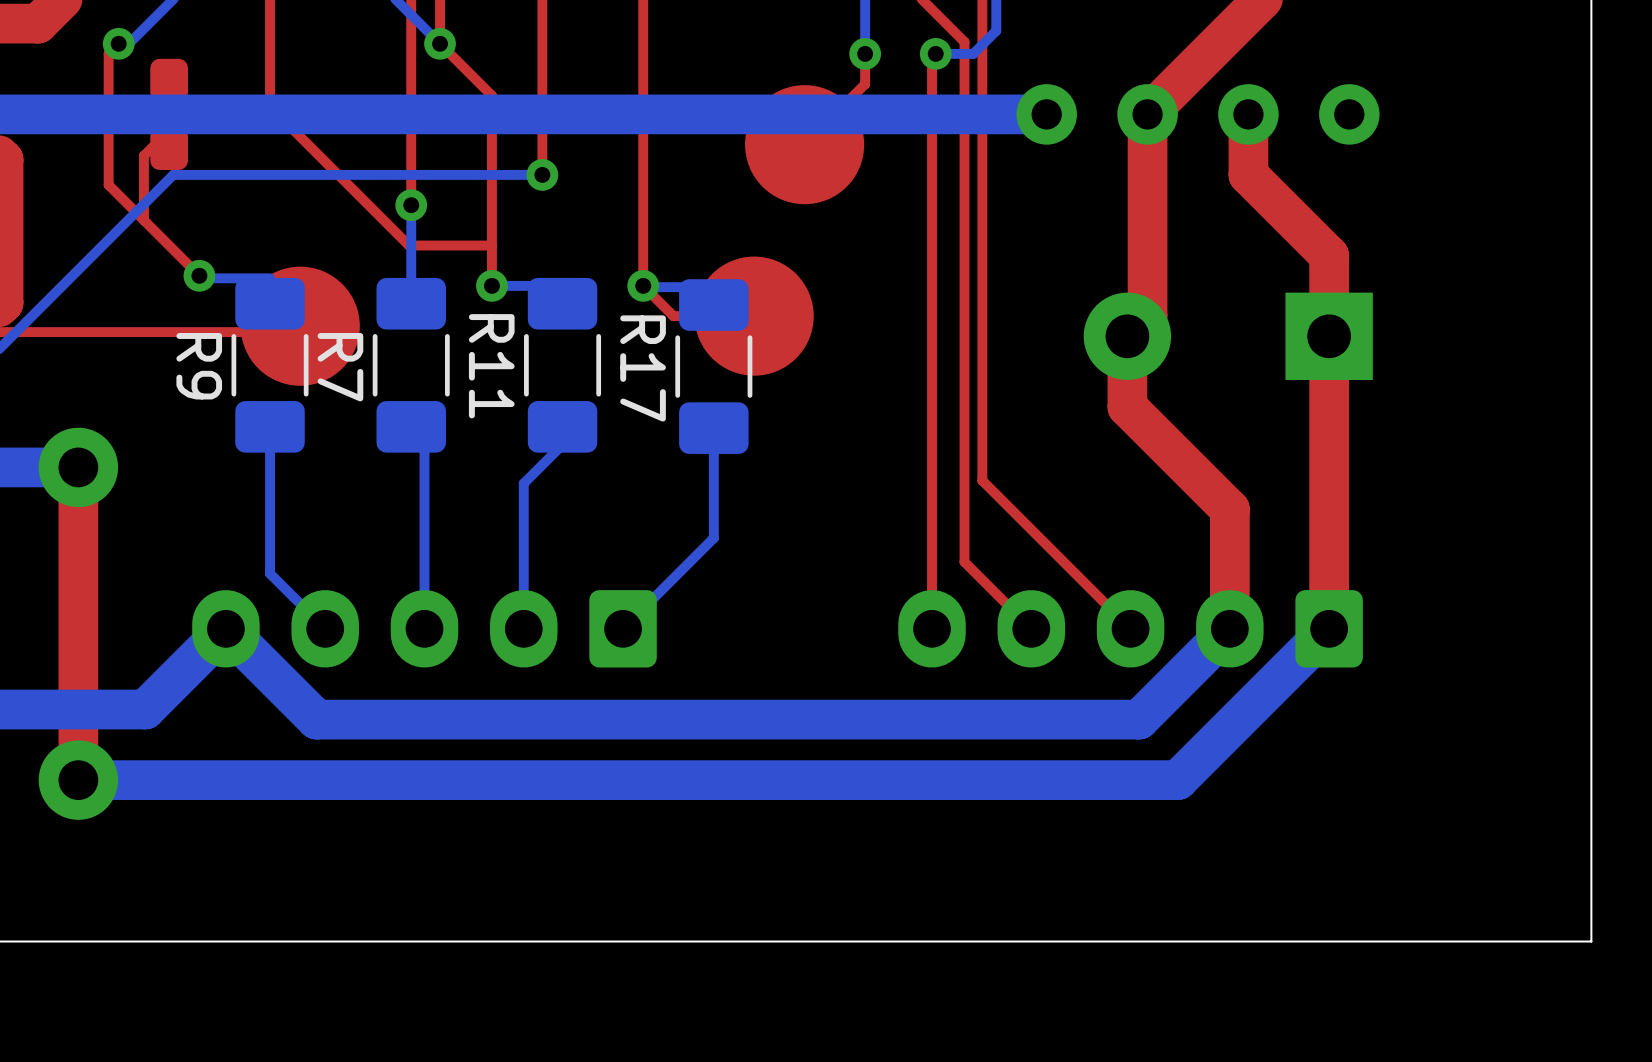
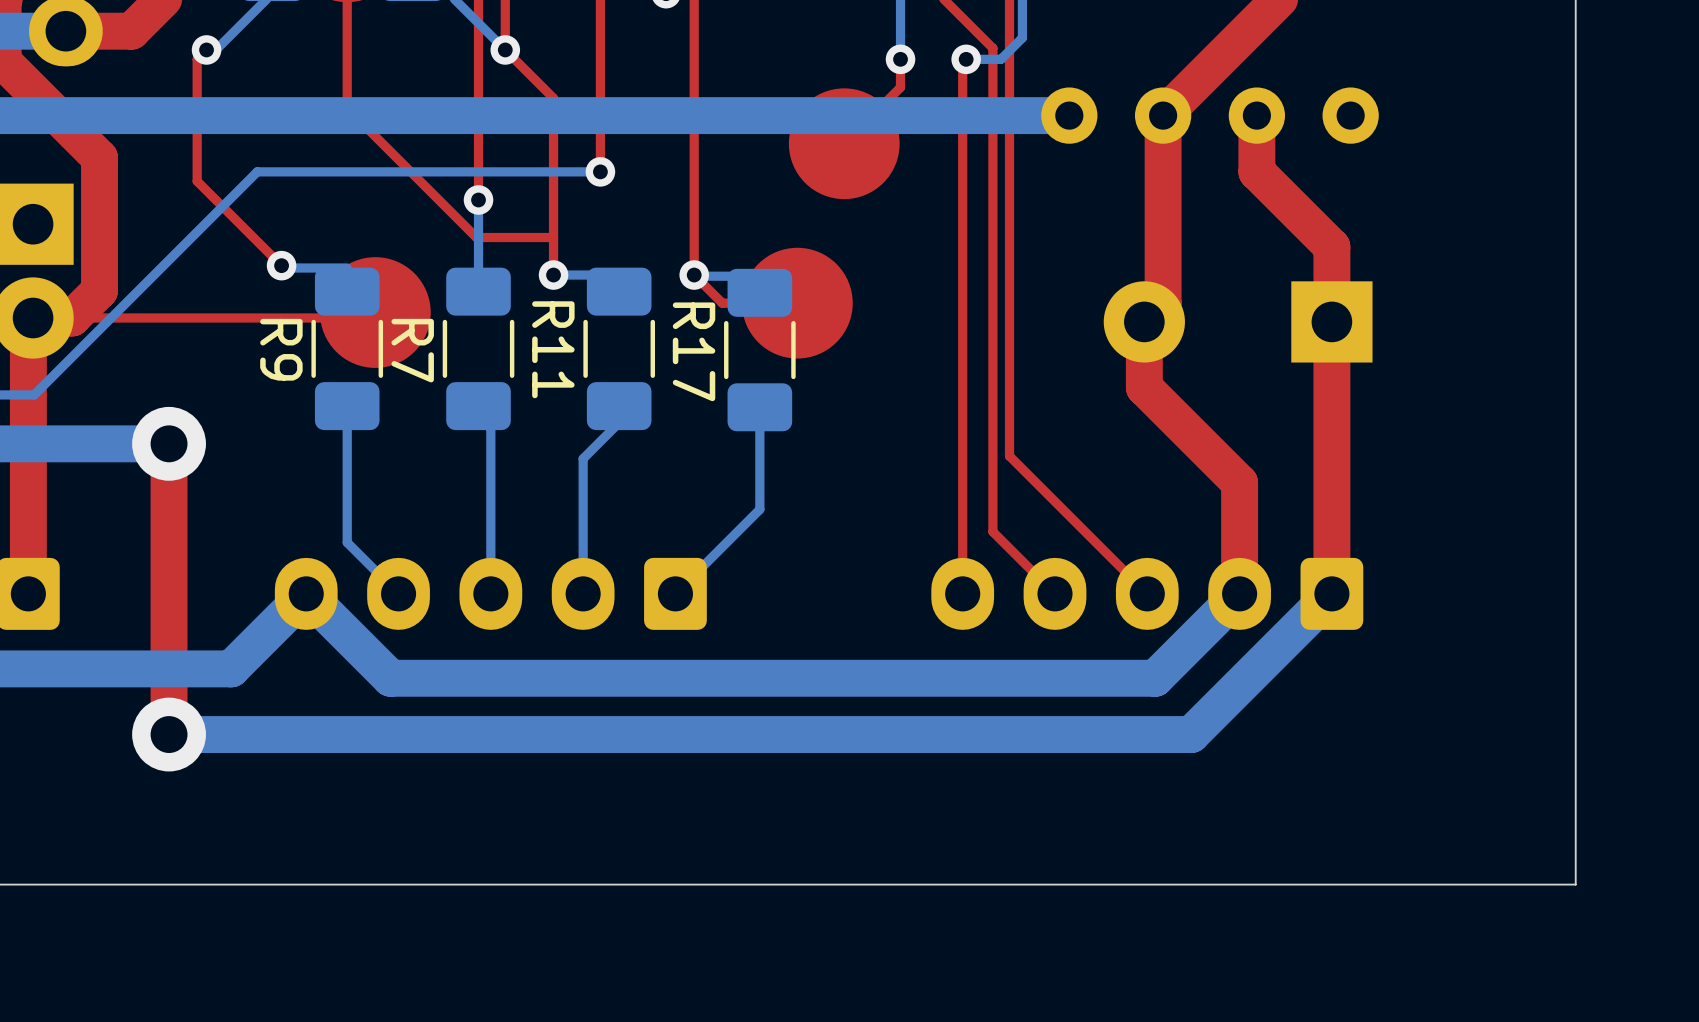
part: (169, 114) -> none
top track: (169, 130) (143, 155) (143, 220) -> none

